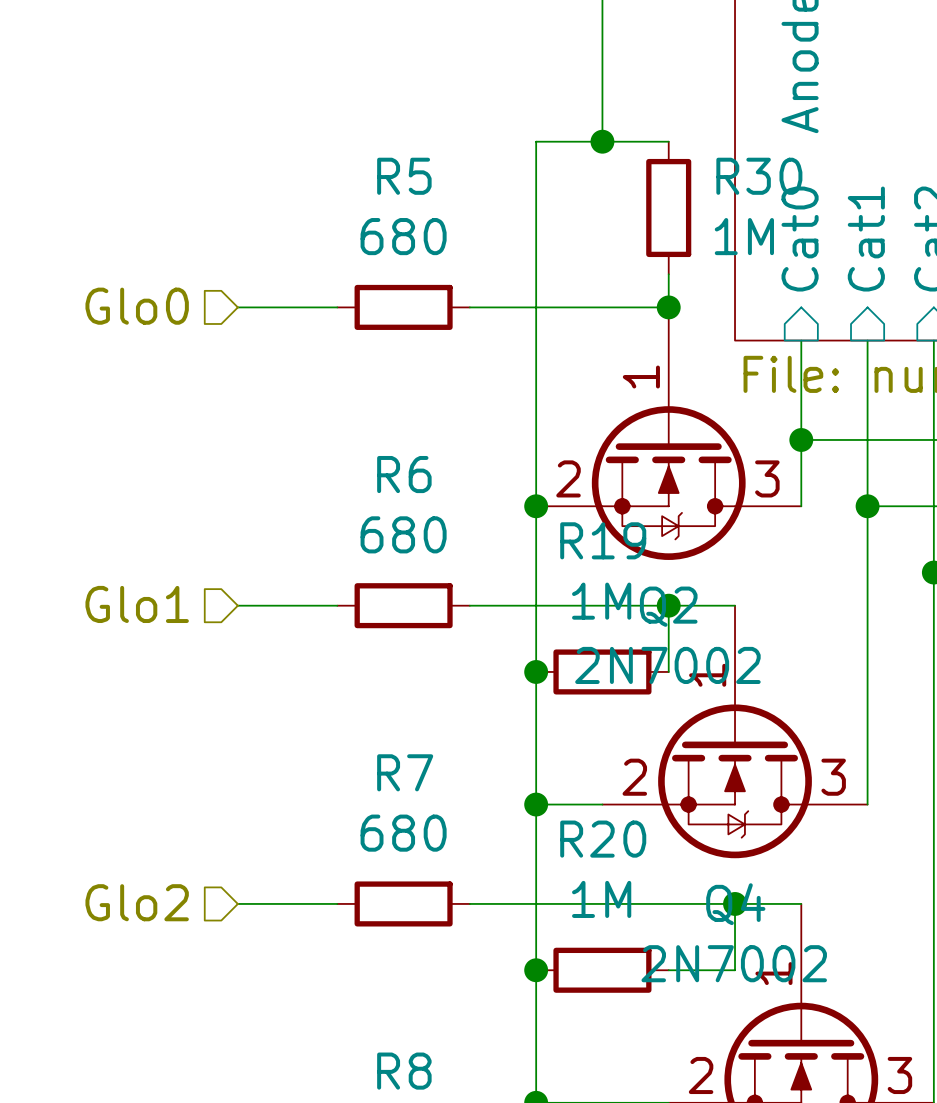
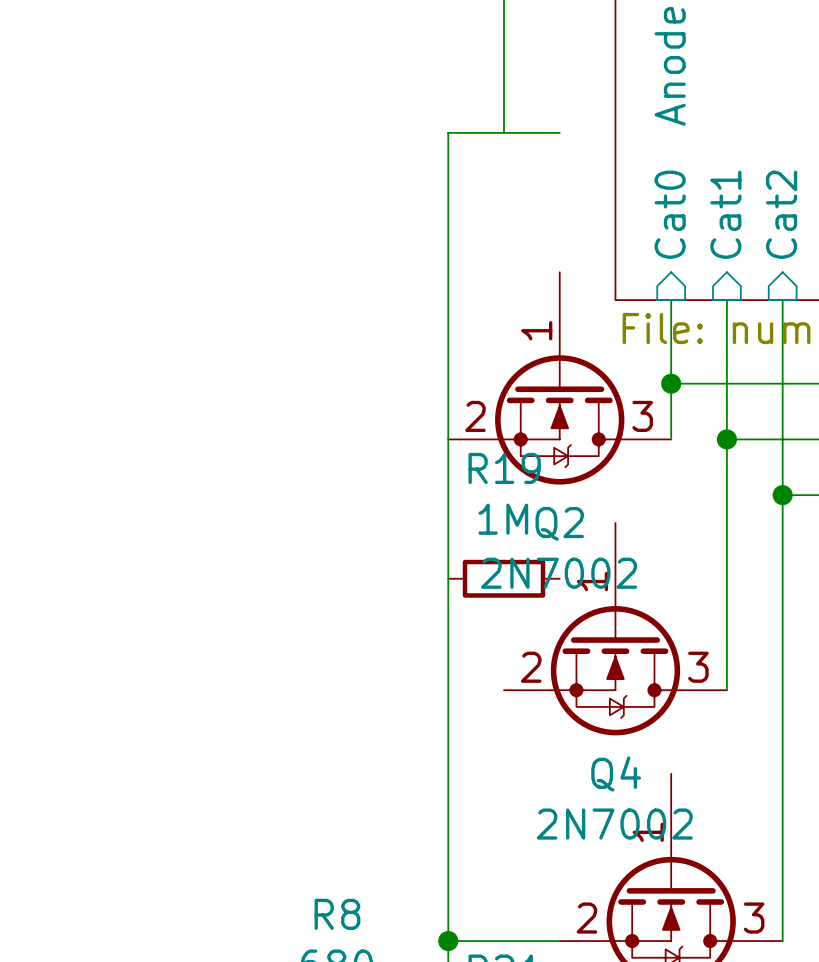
junction: (602, 141) -> none
R30: 1M (668, 207) -> none
wire: (668, 274) (668, 307) (469, 307) -> none
hierarchical label: Glo0 (137, 306) -> none
wire: (237, 307) (337, 307) -> none
R5: 680 (403, 307) -> none
junction: (668, 307) -> none
junction: (536, 506) -> none
hierarchical label: Glo1 (137, 604) -> none
wire: (237, 605) (337, 605) -> none
R6: 680 (403, 605) -> none
wire: (469, 605) (735, 605) -> none
wire: (668, 605) (668, 671) -> none
junction: (668, 605) -> none
junction: (536, 671) -> none
wire: (536, 804) (602, 804) -> none
junction: (536, 804) -> none
hierarchical label: Glo2 (137, 902) -> none
wire: (237, 903) (337, 903) -> none
R7: 680 (403, 903) -> none
wire: (469, 903) (801, 903) -> none
wire: (735, 903) (735, 970) (668, 970) -> none
junction: (735, 903) -> none
junction: (536, 970) -> none
R20: 1M (602, 970) -> none

